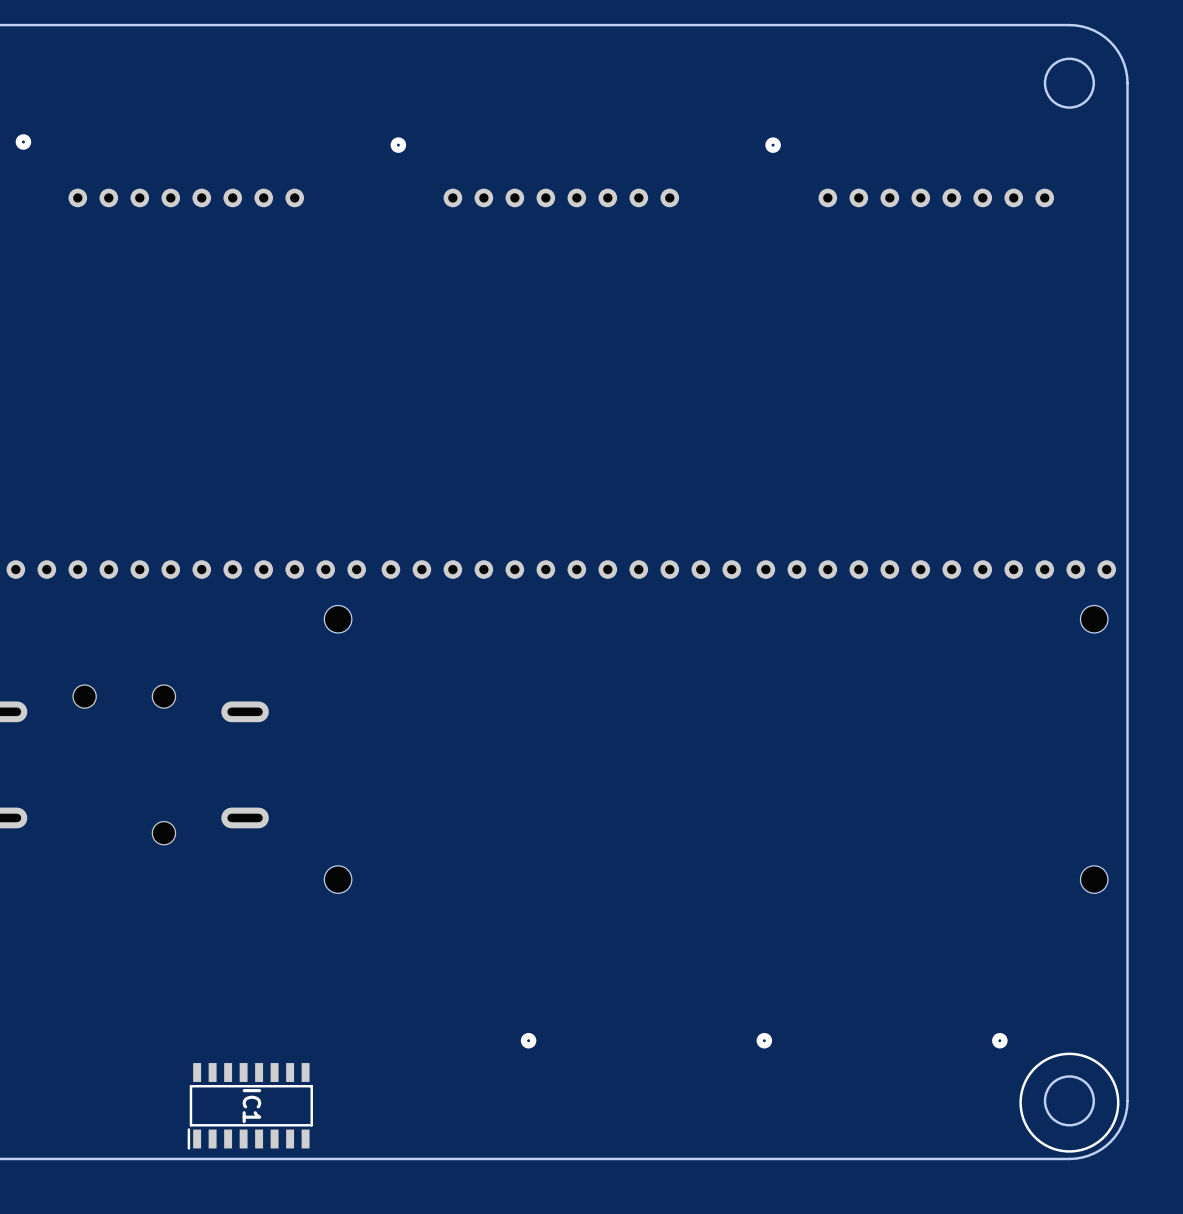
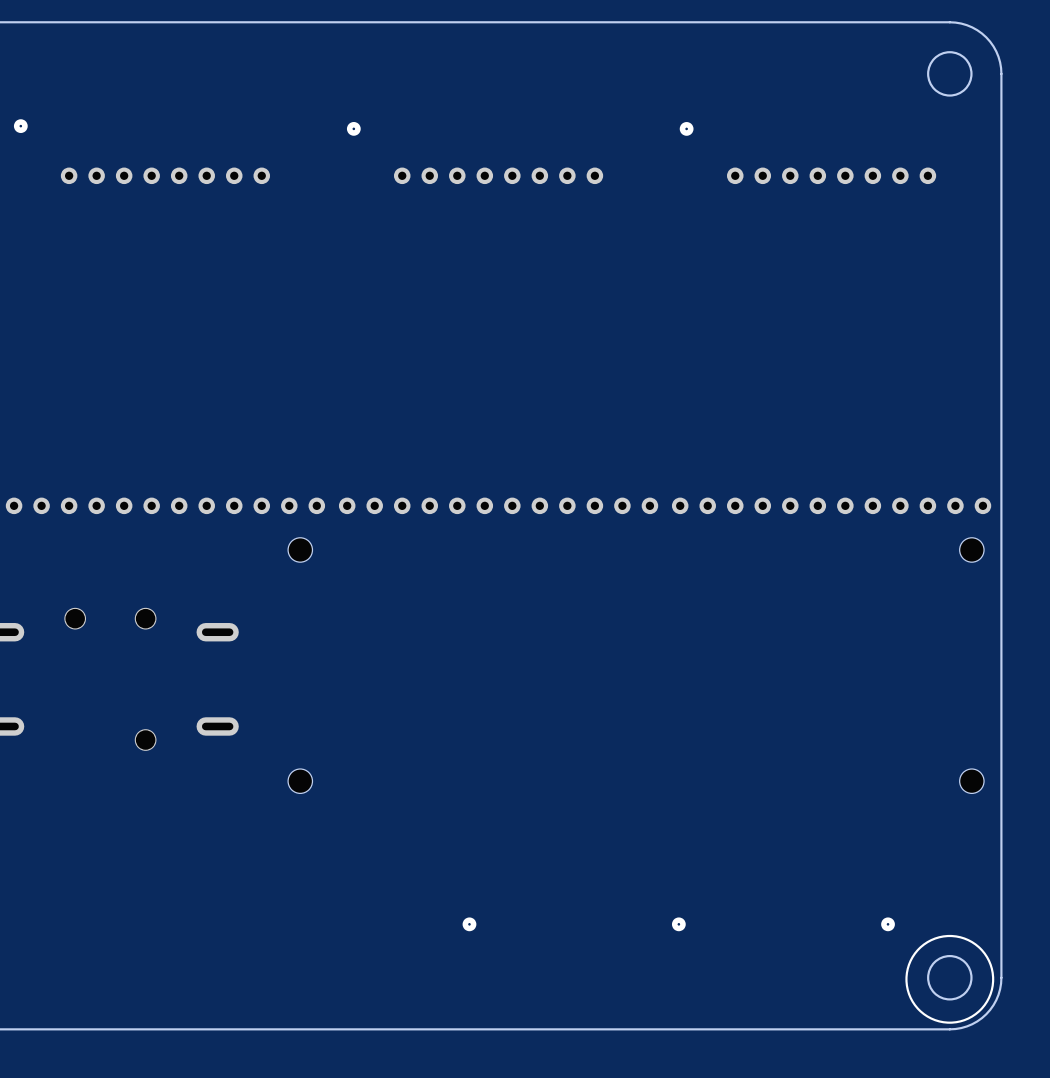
IC1: (250, 1106) -> none

